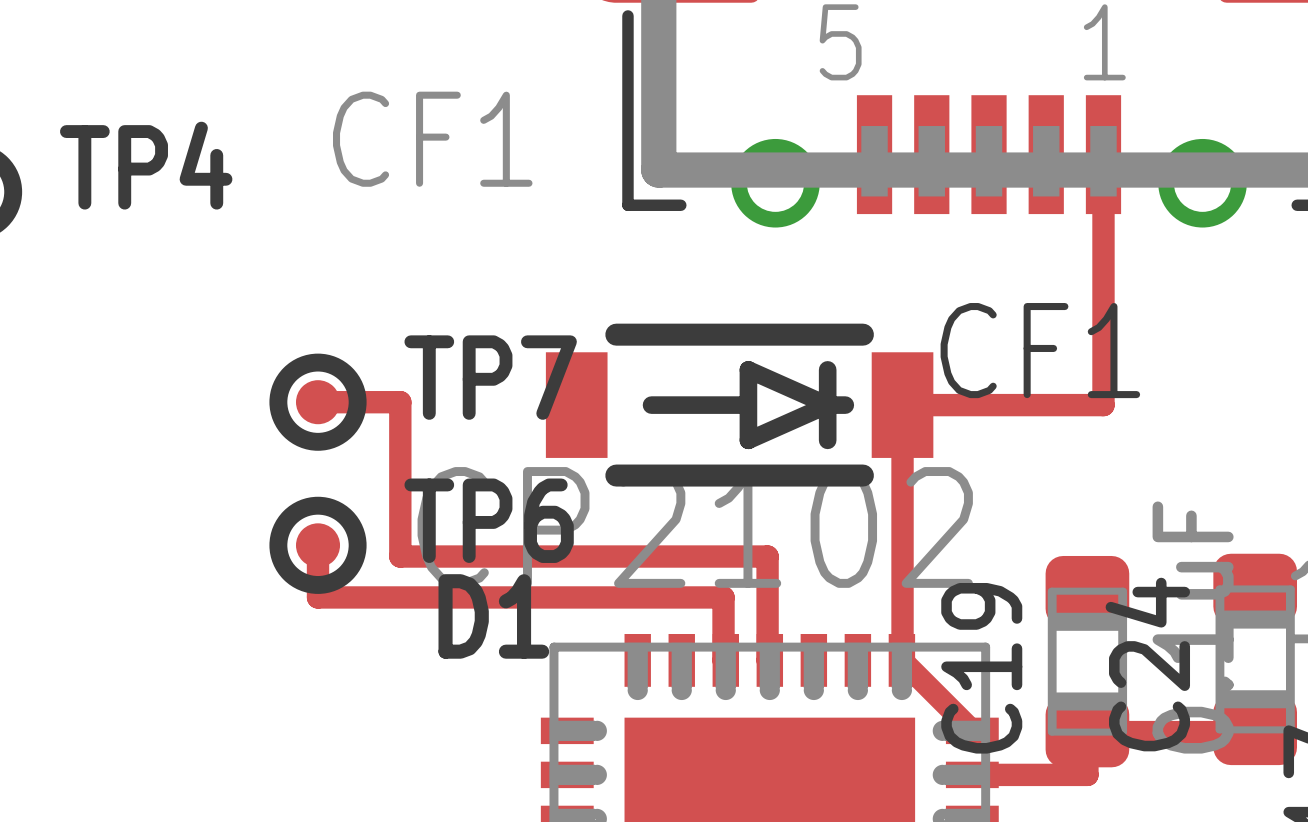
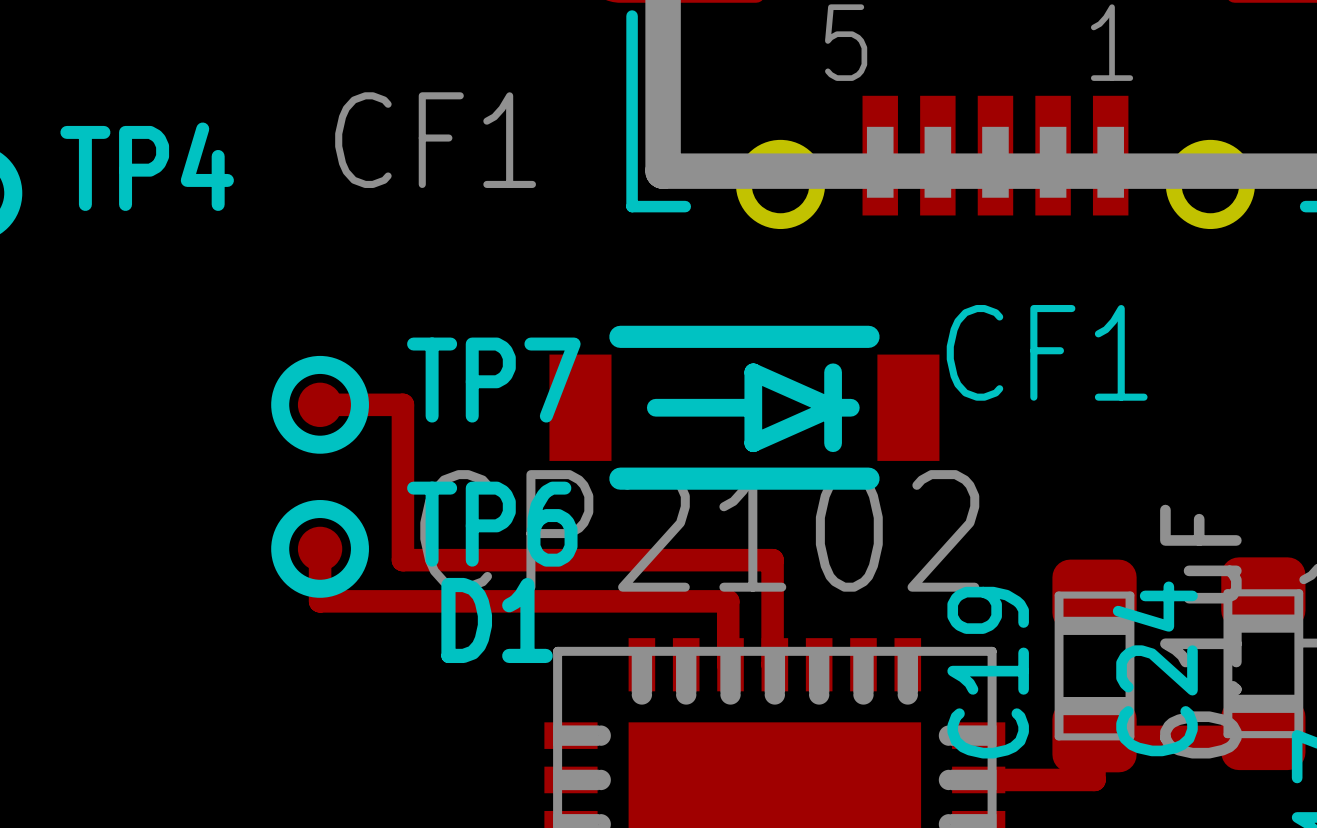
track: (1103, 154) (1103, 405) (902, 405) (902, 660) (972, 730) -> none

